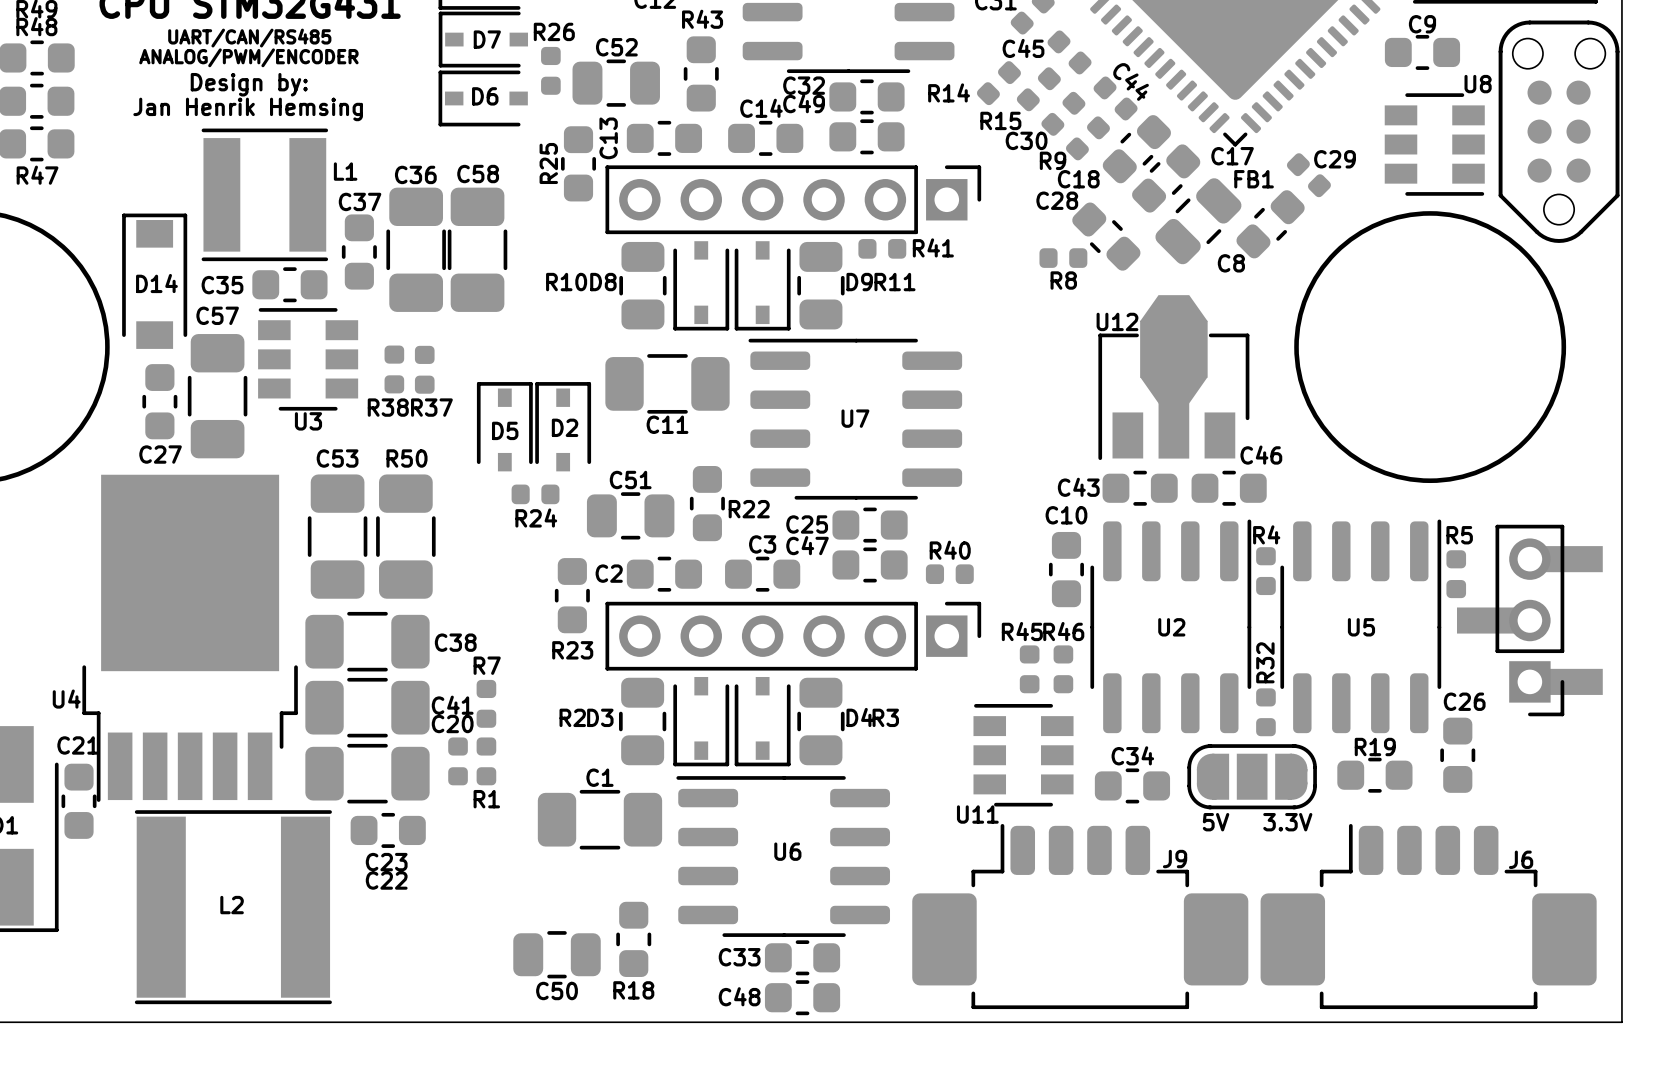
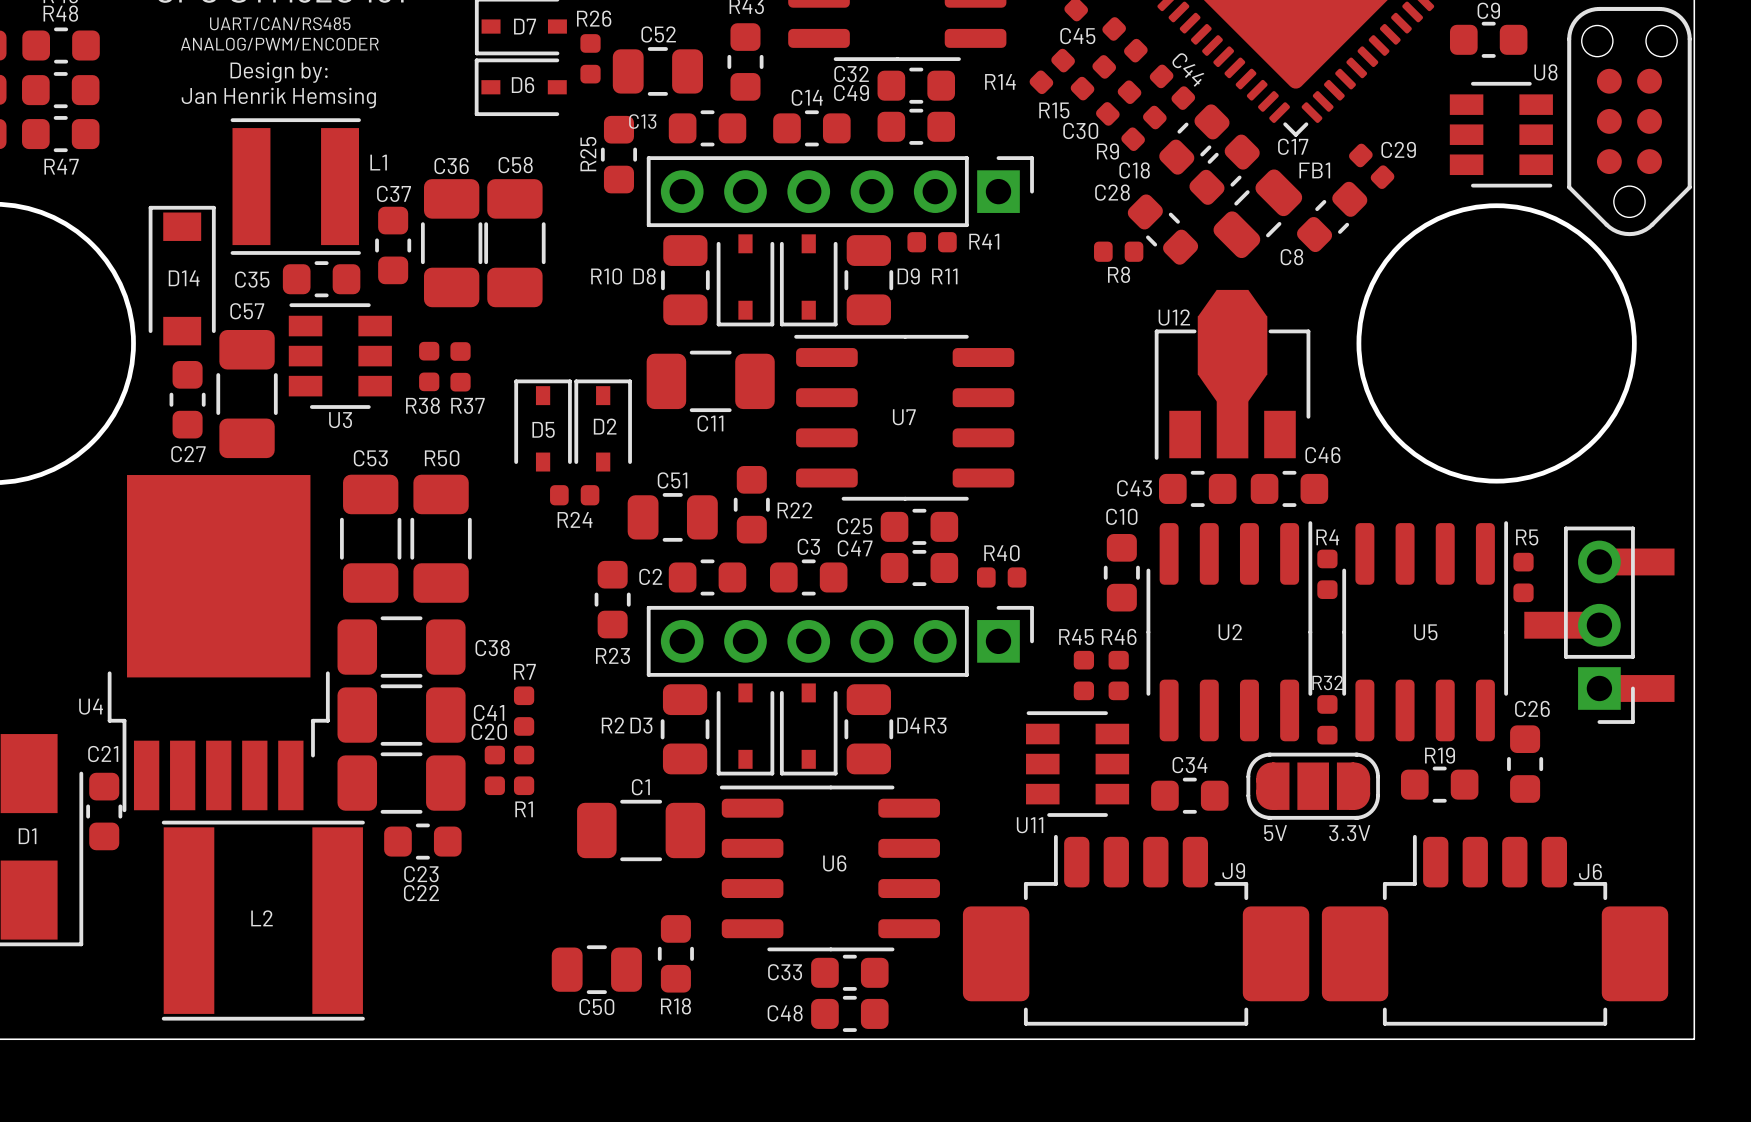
C13 name rotation: 0° (608, 138) -> 90° clockwise (642, 121)
R32 name rotation: 0° (1265, 662) -> 90° clockwise (1327, 682)

